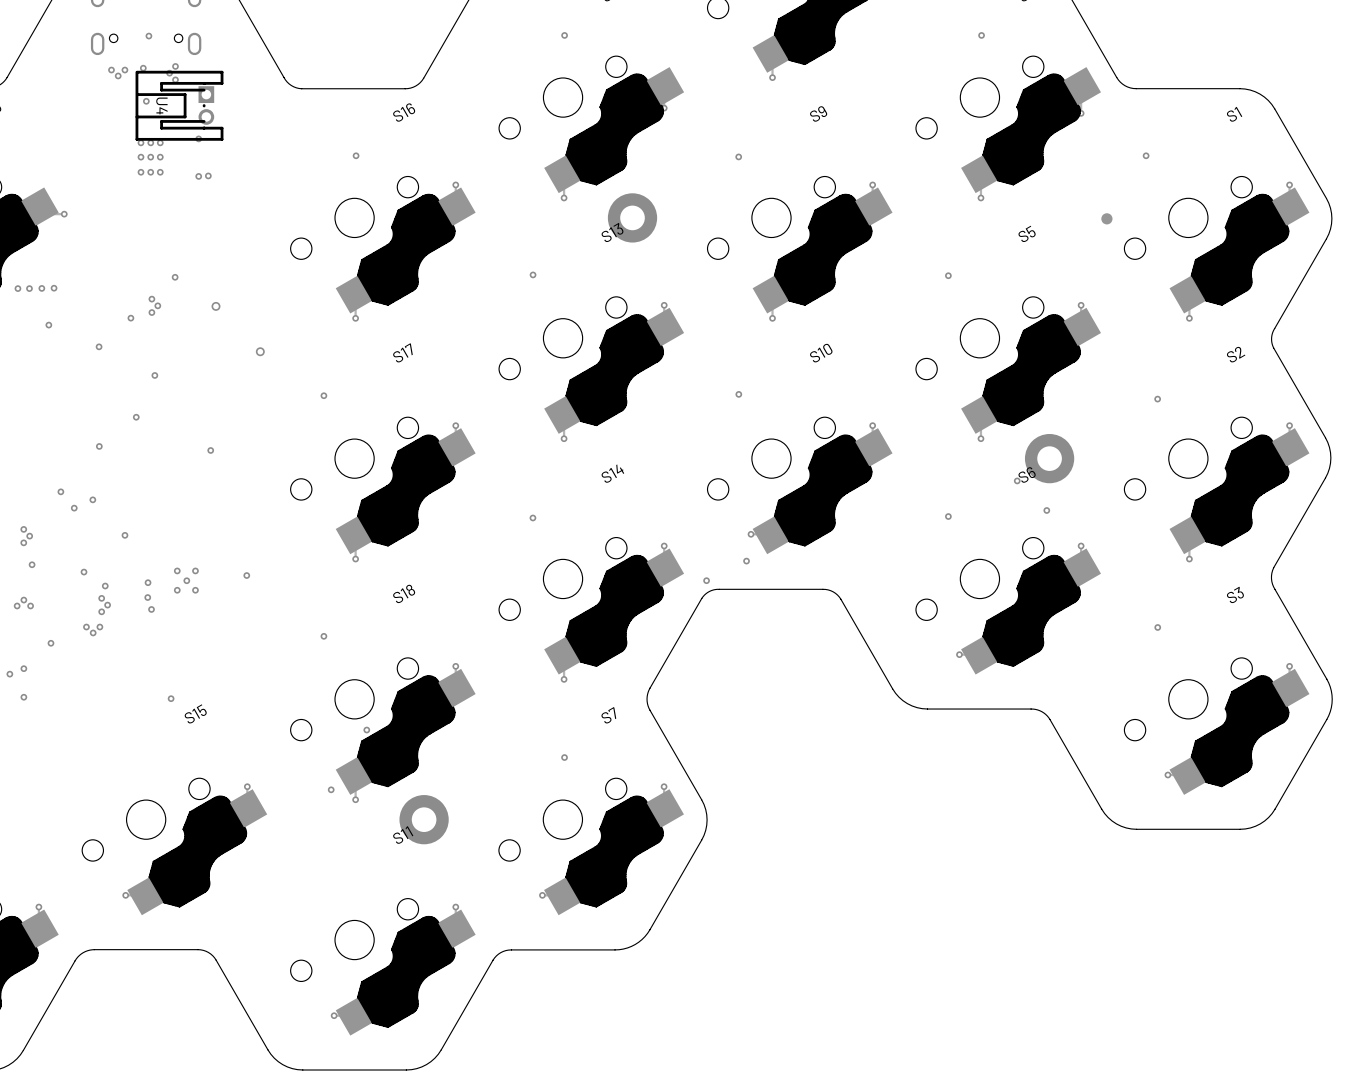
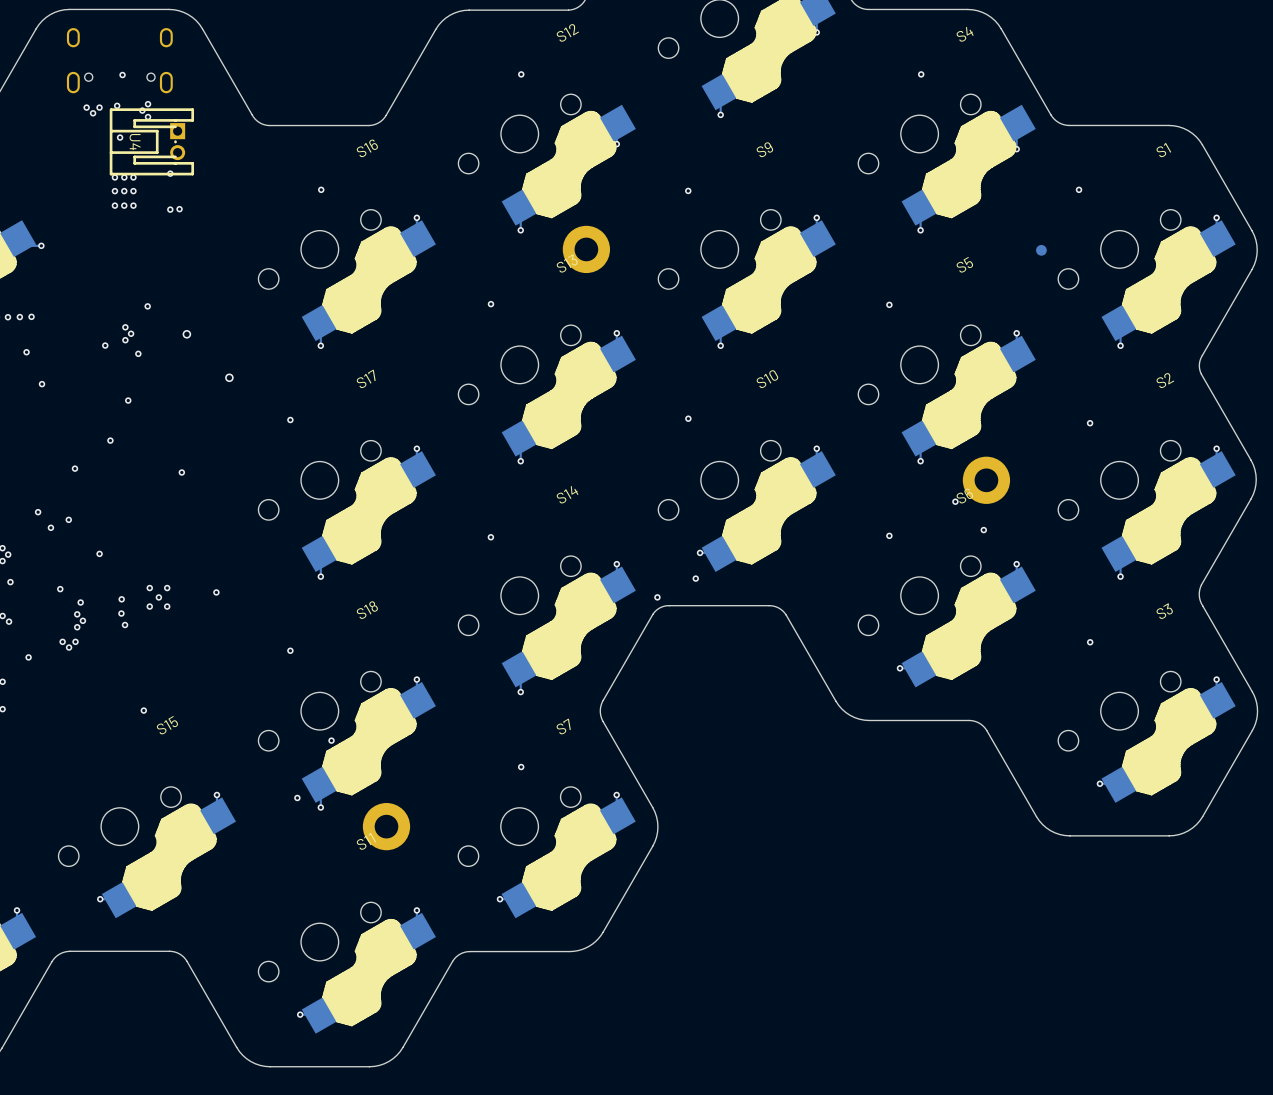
via: none -> (138, 353)
via: (99, 346) -> none
via: none -> (42, 384)

